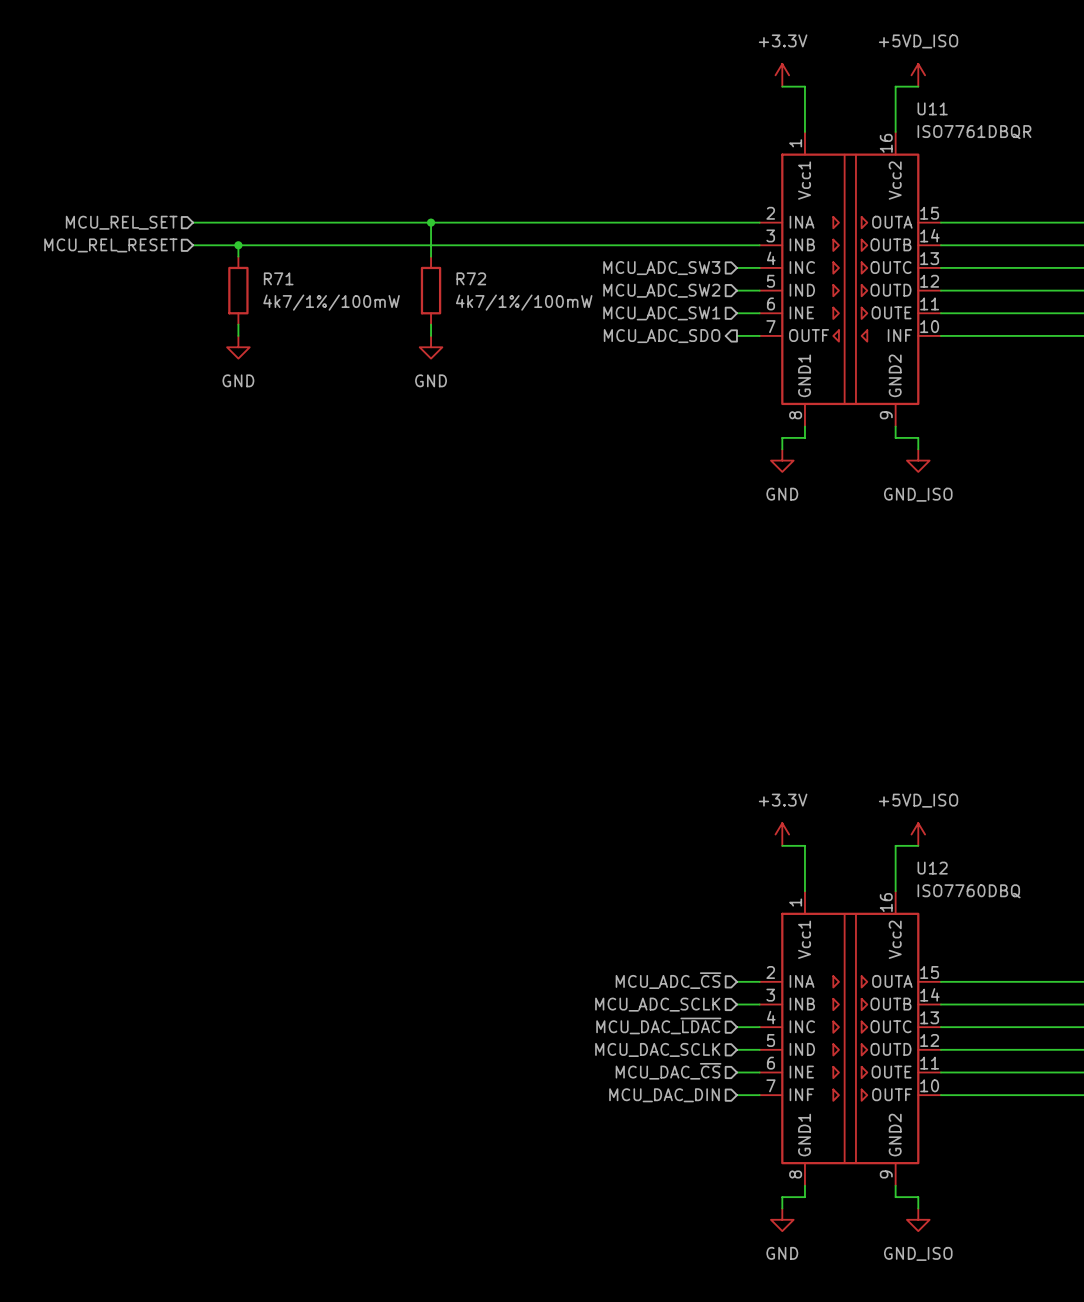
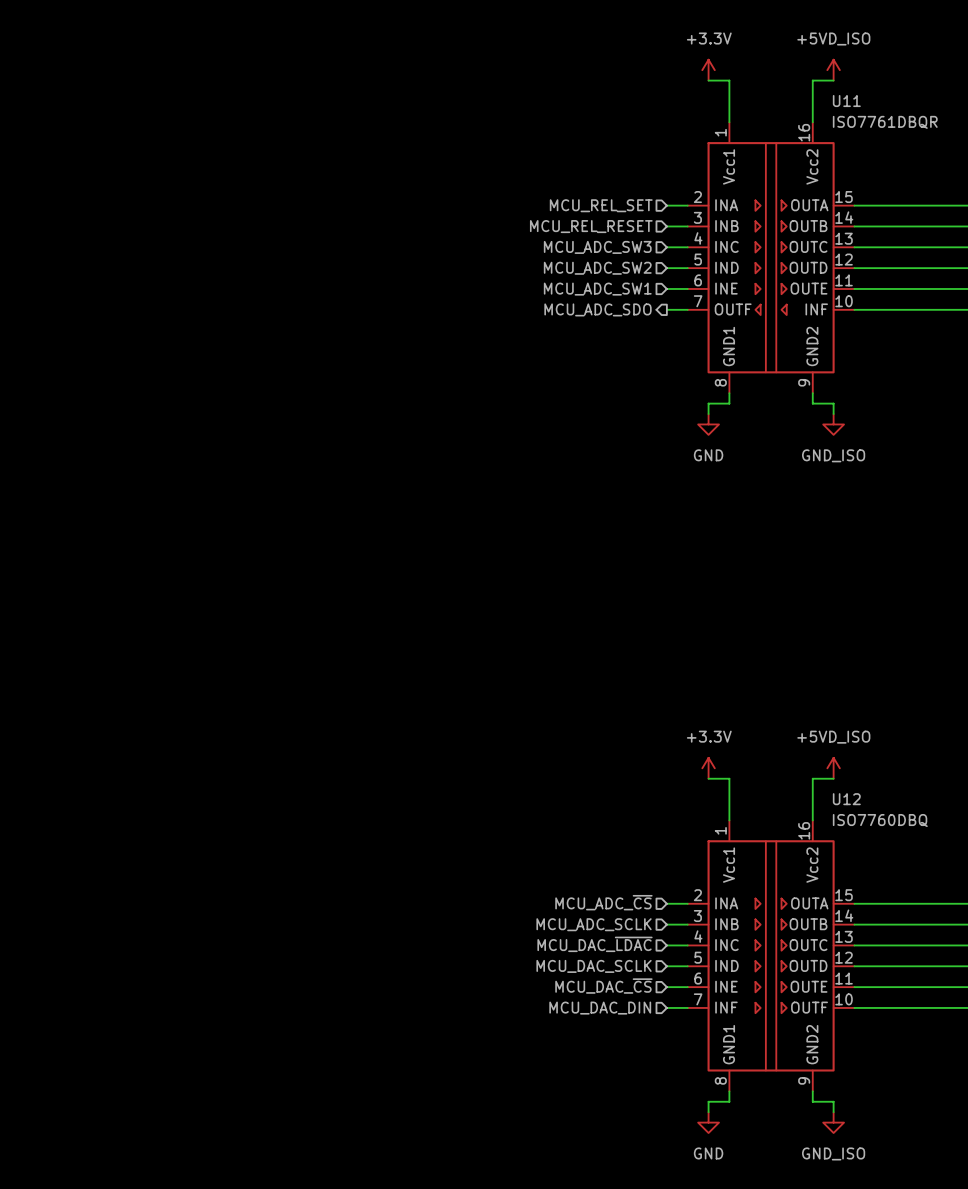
hierarchical label: MCU_REL_SET (121, 222) -> none
wire: (193, 222) (736, 222) -> none
wire: (431, 222) (431, 256) -> none
junction: (431, 222) -> none
hierarchical label: none -> MCU_REL_SET (601, 205)
hierarchical label: MCU_REL_RESET (110, 245) -> none
wire: (193, 245) (736, 245) -> none
wire: (238, 245) (238, 256) -> none
junction: (238, 245) -> none
hierarchical label: none -> MCU_REL_RESET (591, 226)
R71: 4k7/1%/100mW (238, 290) -> none
R72: 4k7/1%/100mW (431, 290) -> none
wire: (238, 324) (238, 335) -> none
wire: (431, 324) (431, 335) -> none
power symbol: GND (238, 347) -> none
power symbol: GND (431, 347) -> none

